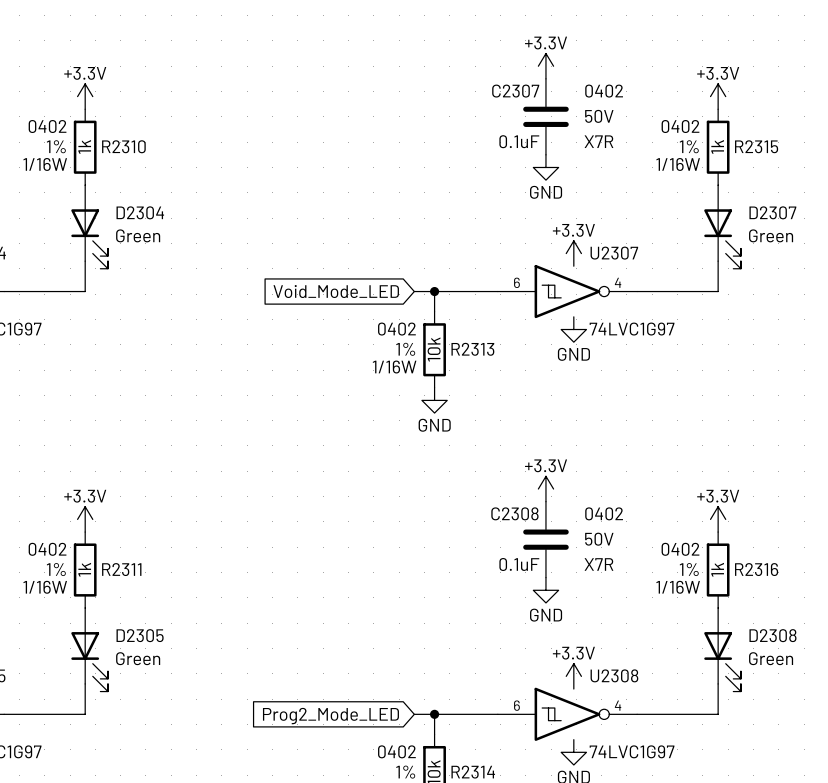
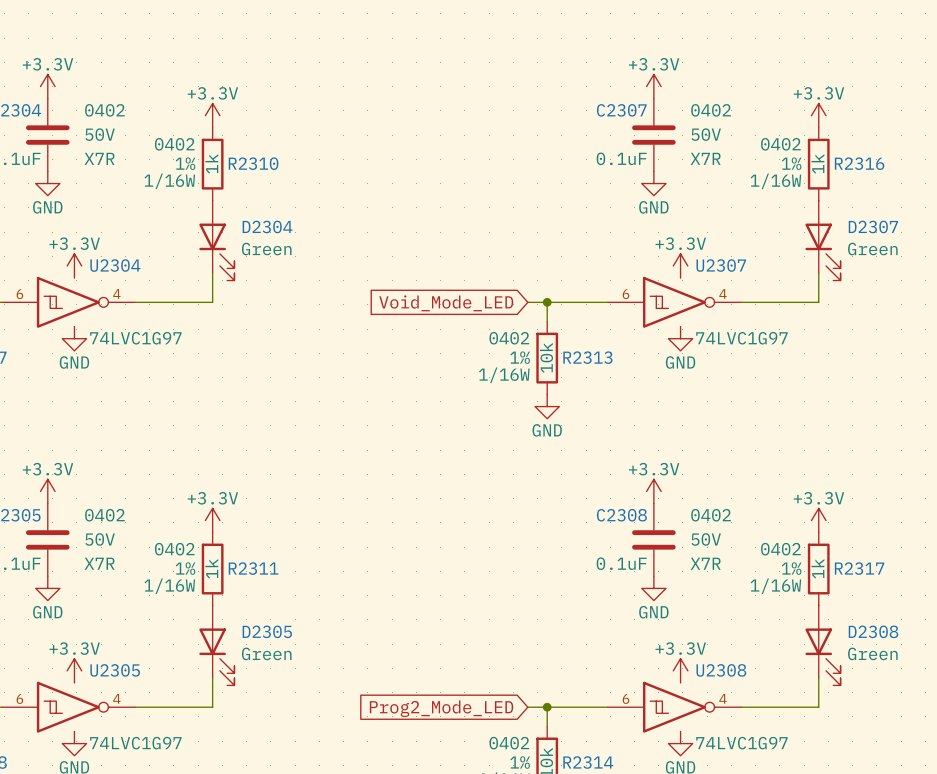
R2315 name: R2315 (756, 146) -> R2316 (859, 163)
R2316 name: R2316 (756, 569) -> R2317 (859, 568)

